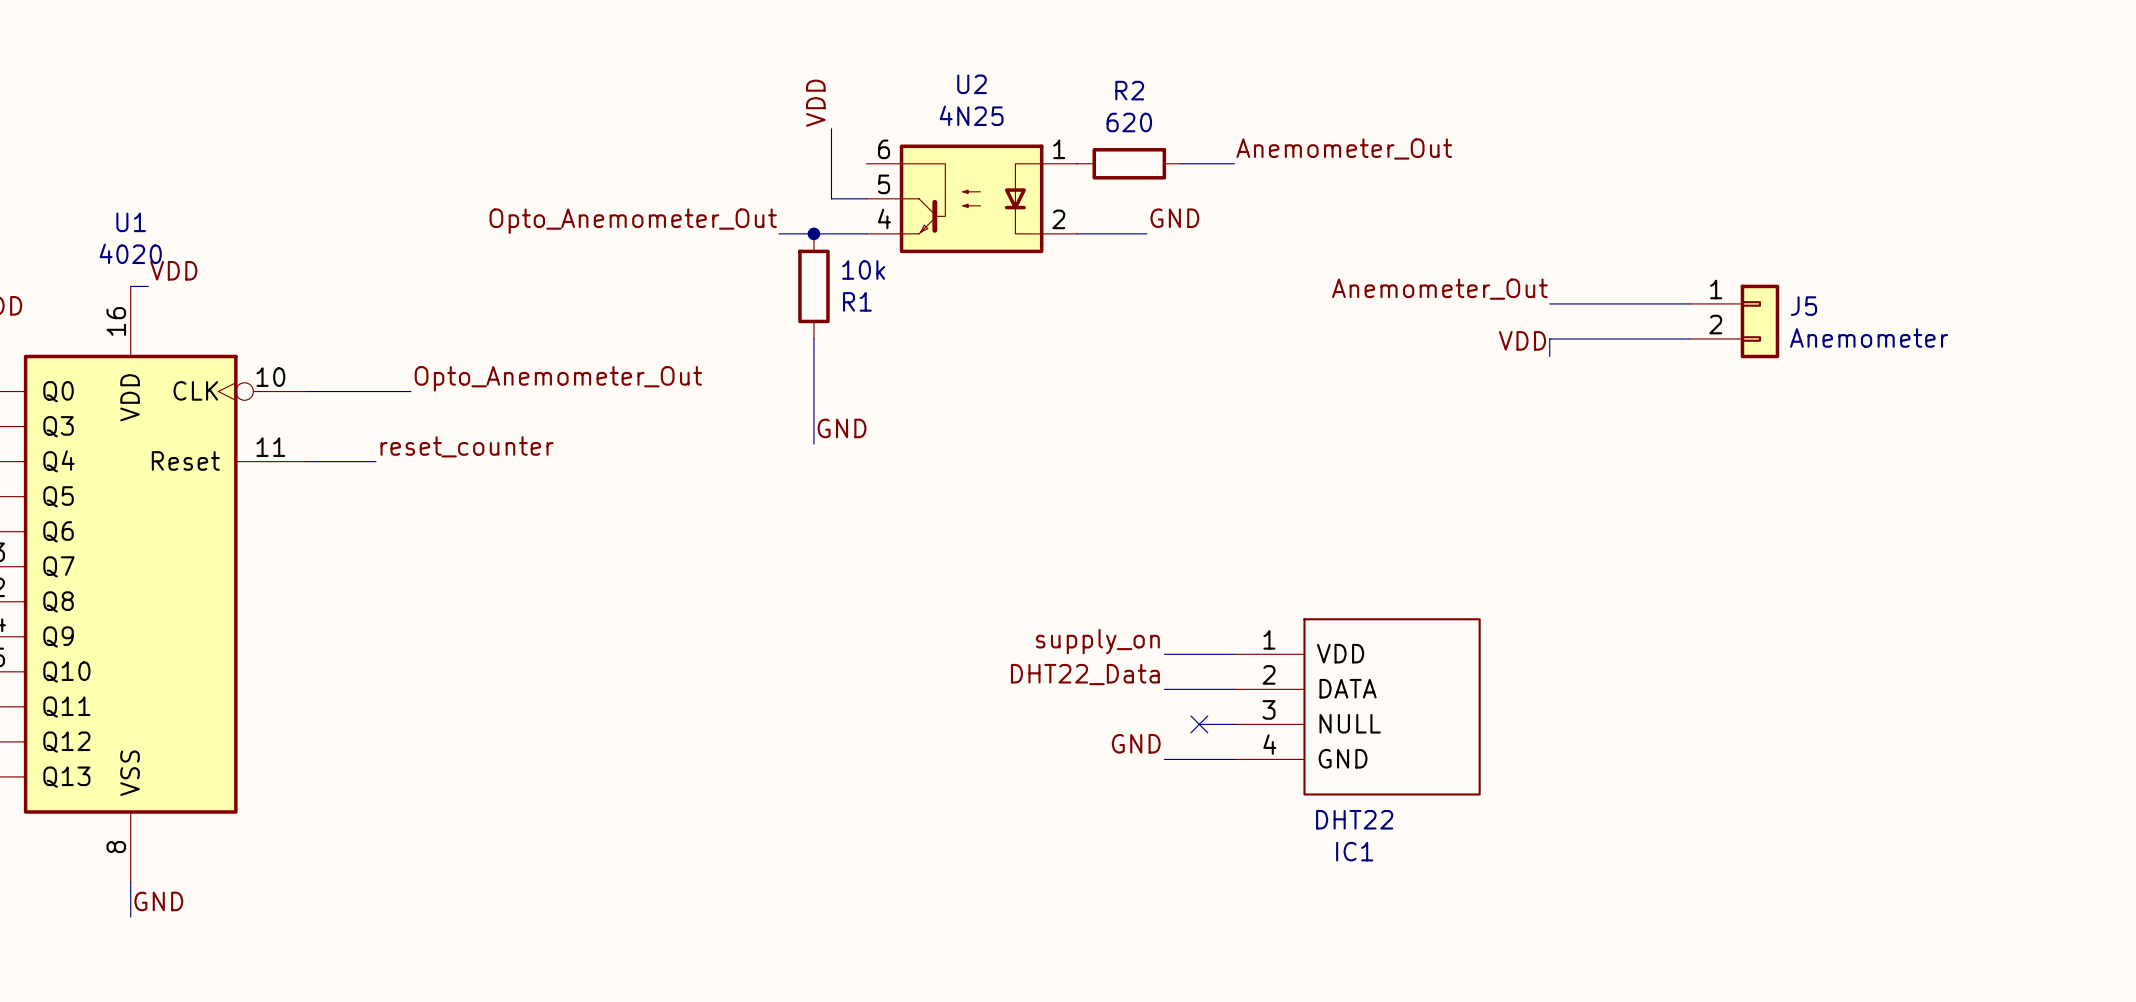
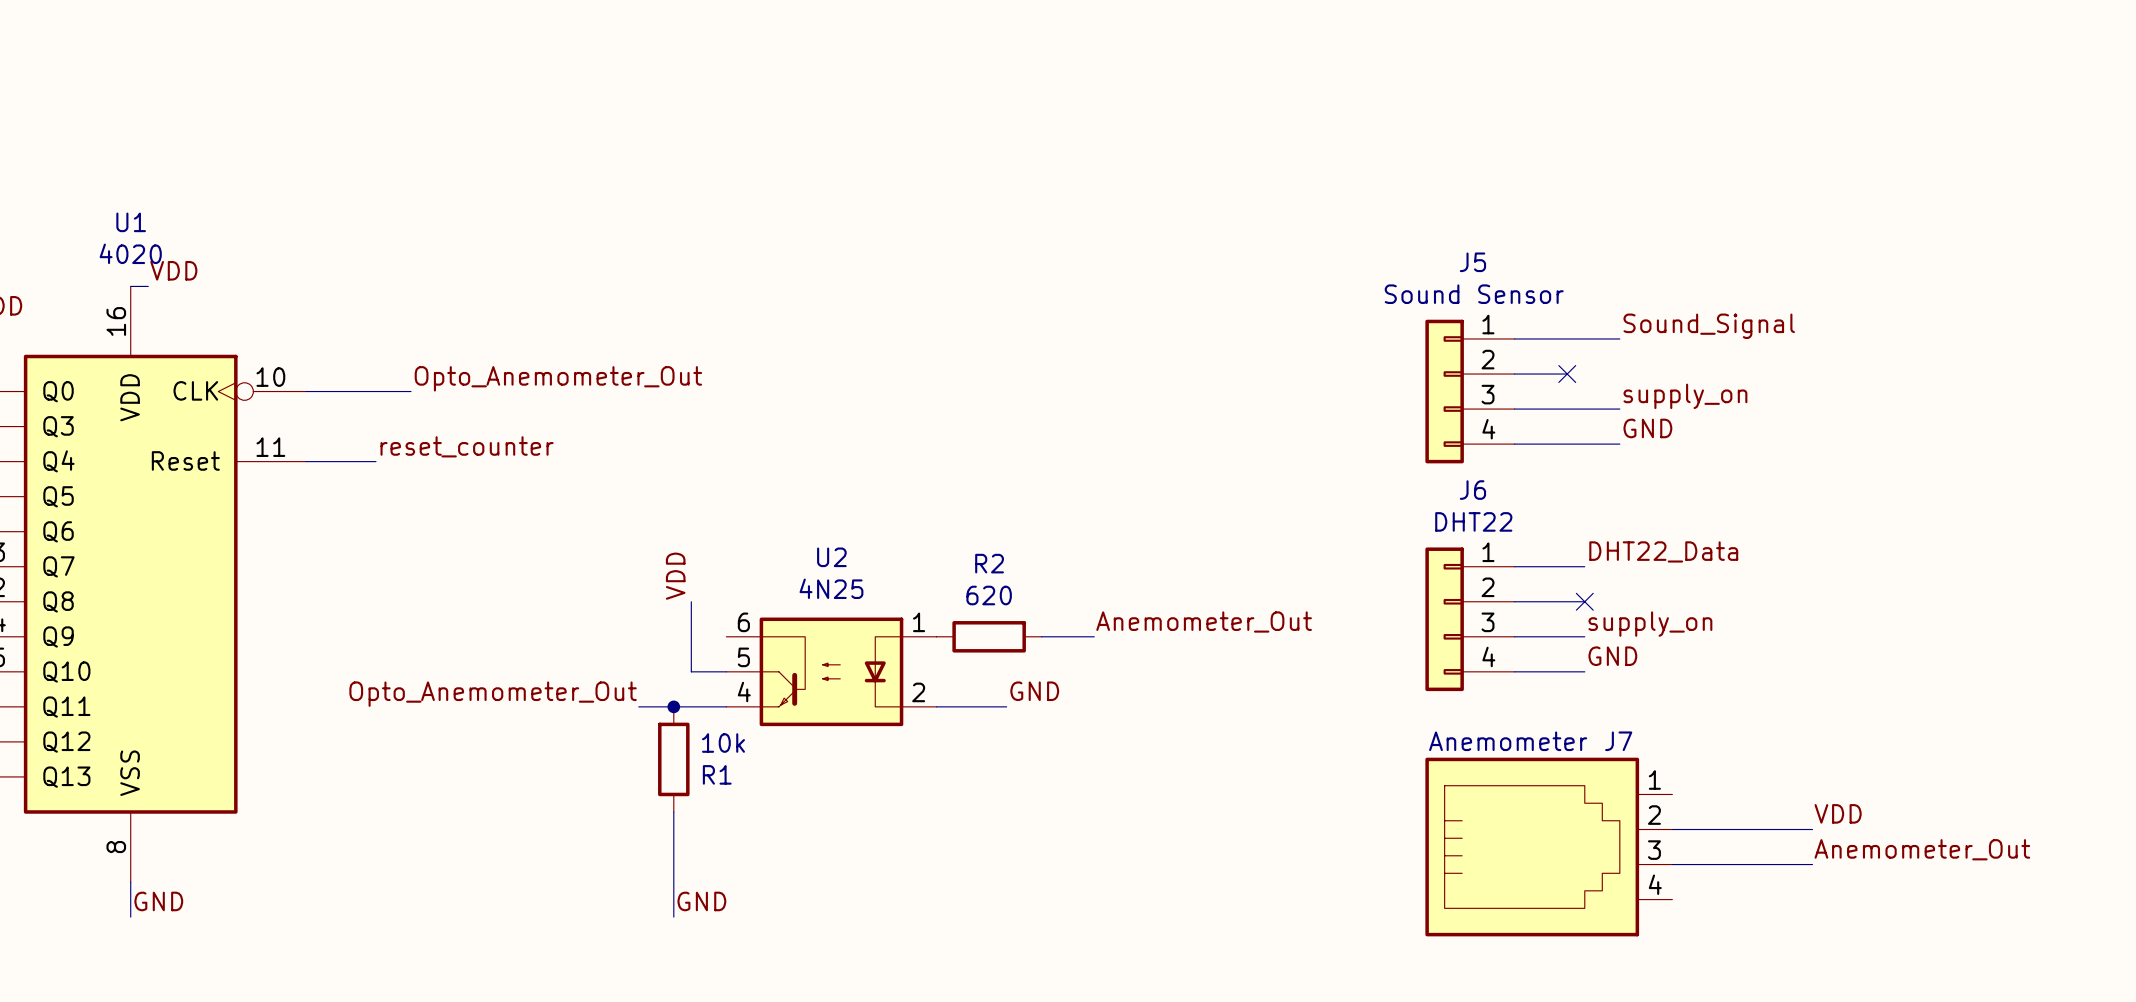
label: VDD (815, 103) -> none
wire: (831, 128) (831, 198) (866, 198) -> none
label: Anemometer_Out (1344, 148) -> none
R2 position: (1129, 163) -> (989, 636)
wire: (1181, 163) (1234, 163) -> none
U2 position: (971, 198) -> (831, 671)
label: GND (1174, 218) -> none
label: Opto_Anemometer_Out (633, 221) -> none
wire: (778, 233) (866, 233) -> none
junction: (813, 233) -> none
wire: (1076, 233) (1146, 233) -> none
J5 symbol: [1689, 284, 1780, 359] -> [1425, 319, 1515, 464]
R1 position: (813, 286) -> (673, 759)
label: Anemometer_Out (1439, 289) -> none
wire: (1549, 303) (1689, 303) -> none
J5 name position: J5 (1803, 306) -> J5 (1472, 262)
label: none -> Sound_Signal (1709, 326)
J5 value: Anemometer (1869, 337) -> Sound Sensor (1474, 294)
wire: (813, 338) (813, 444) -> none
wire: (1549, 338) (1549, 356) -> (1549, 338) (1514, 338)
wire: (1619, 338) (1689, 338) -> (1514, 566) (1584, 566)
label: VDD (1522, 340) -> none
wire: none -> (1514, 374) (1567, 374)
no-connect mark: none -> (1567, 374)
label: none -> supply_on (1685, 396)
wire: none -> (1514, 409) (1619, 409)
label: GND (842, 428) -> none
label: none -> GND (1647, 428)
wire: none -> (1514, 444) (1619, 444)
label: none -> DHT22_Data (1663, 551)
label: none -> VDD (675, 576)
wire: none -> (691, 601) (691, 671) (726, 671)
wire: none -> (1514, 601) (1584, 601)
no-connect mark: none -> (1584, 601)
J6: none -> DHT22 (1470, 619)
label: none -> Anemometer_Out (1204, 622)
label: none -> supply_on (1650, 624)
wire: none -> (1041, 636) (1094, 636)
wire: none -> (1514, 636) (1584, 636)
label: supply_on (1097, 641) -> none
wire: (1164, 654) (1234, 654) -> none
label: none -> GND (1612, 656)
wire: none -> (1514, 671) (1584, 671)
label: DHT22_Data (1085, 674) -> none
wire: (1164, 689) (1234, 689) -> (936, 706) (1006, 706)
label: none -> GND (1034, 691)
label: none -> Opto_Anemometer_Out (493, 694)
wire: none -> (638, 706) (726, 706)
junction: none -> (673, 706)
IC1: DHT22 (1357, 706) -> none
wire: (1199, 724) (1234, 724) -> none
no-connect mark: (1199, 724) -> none
label: GND (1136, 743) -> none
wire: (1164, 759) (1234, 759) -> none
wire: none -> (673, 811) (673, 917)
label: none -> VDD (1838, 813)
wire: none -> (1672, 829) (1812, 829)
J7: none -> Anemometer (1548, 847)
label: none -> Anemometer_Out (1922, 849)
wire: none -> (1672, 864) (1812, 864)
label: none -> GND (701, 901)

